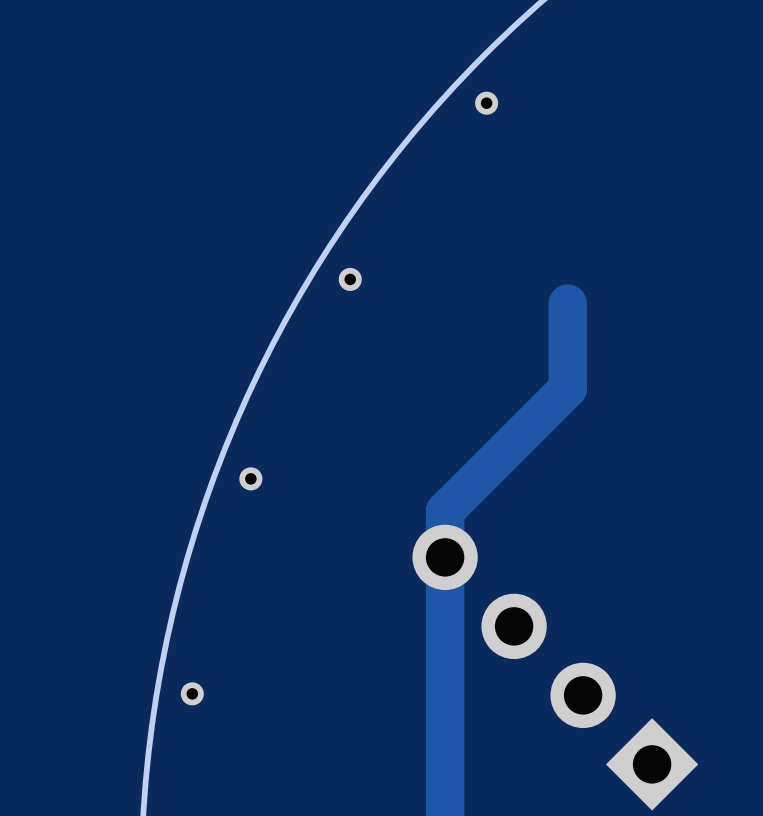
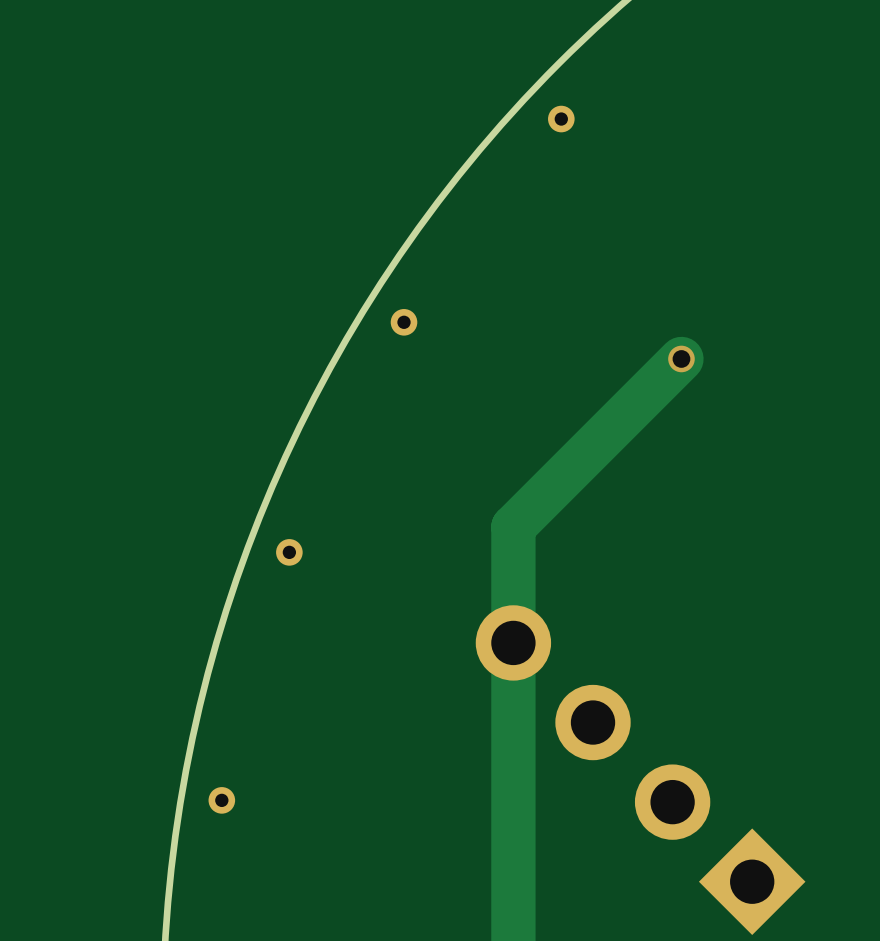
track: (567, 303) (567, 388) (445, 511) -> (681, 358) (513, 527) (513, 589)
via: none -> (681, 358)

